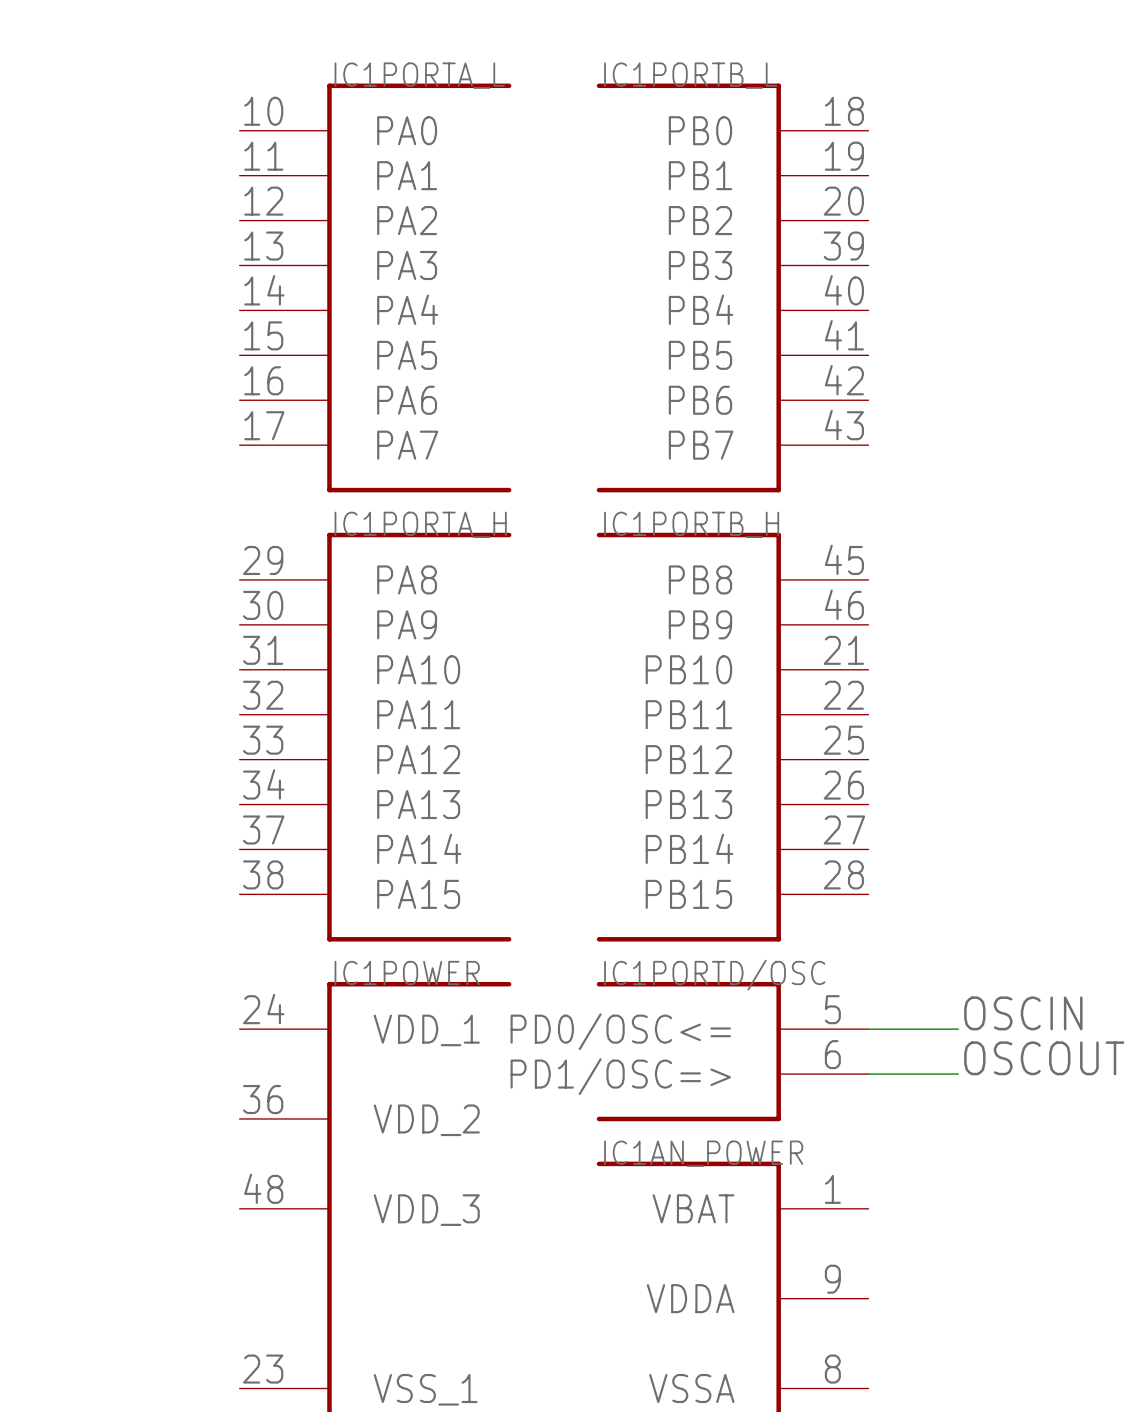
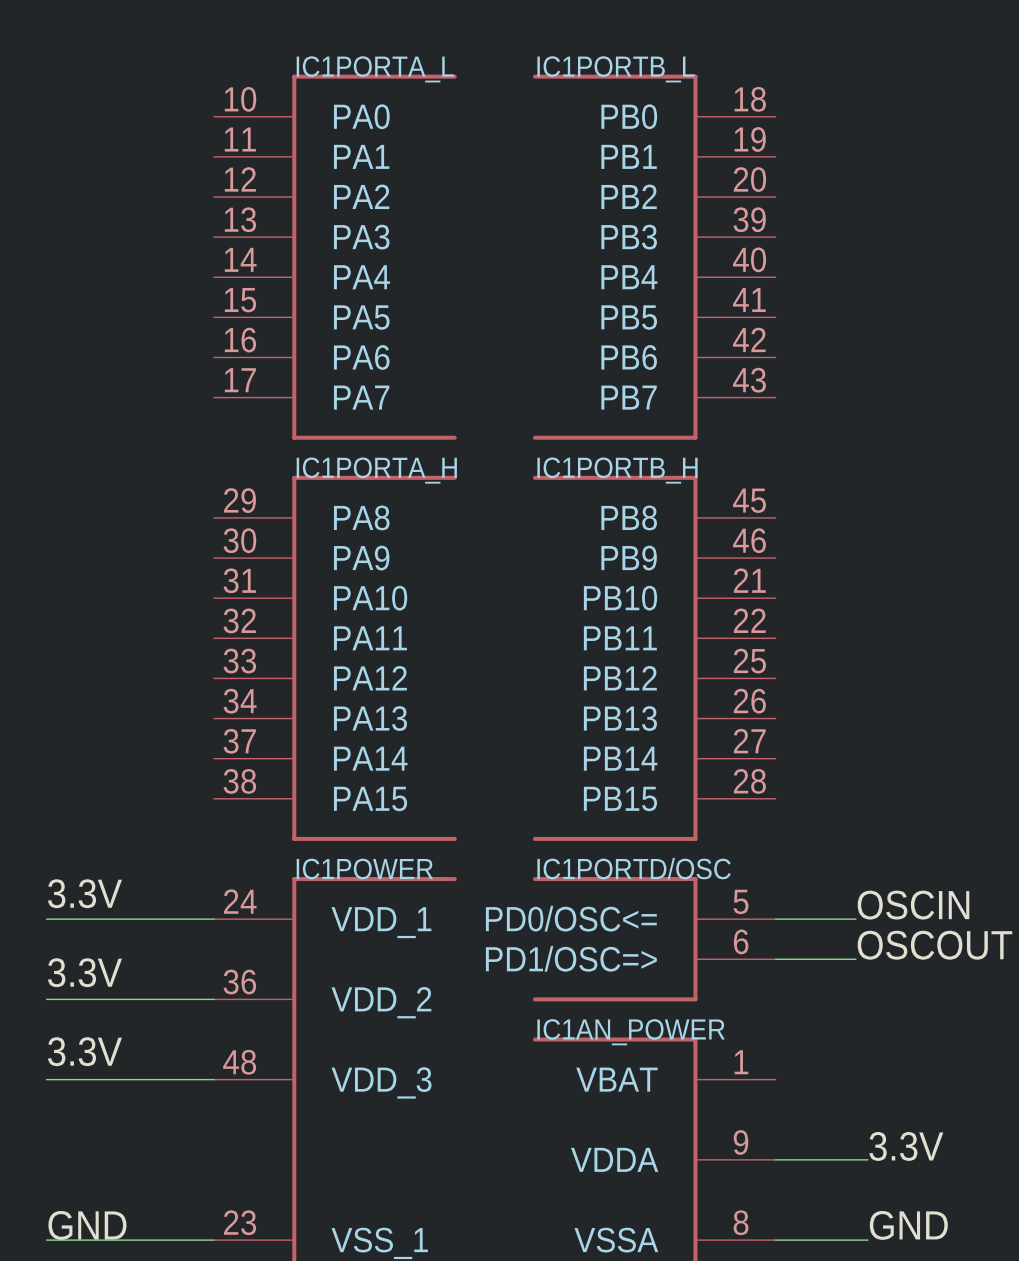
label: none -> 3.3V (85, 893)
wire: none -> (46, 919) (214, 919)
label: none -> 3.3V (85, 972)
wire: none -> (46, 999) (214, 999)
label: none -> 3.3V (85, 1051)
wire: none -> (46, 1079) (214, 1079)
label: none -> 3.3V (906, 1146)
wire: none -> (775, 1159) (867, 1159)
label: none -> GND (87, 1225)
label: none -> GND (908, 1225)
wire: none -> (46, 1240) (214, 1240)
wire: none -> (775, 1240) (867, 1240)

